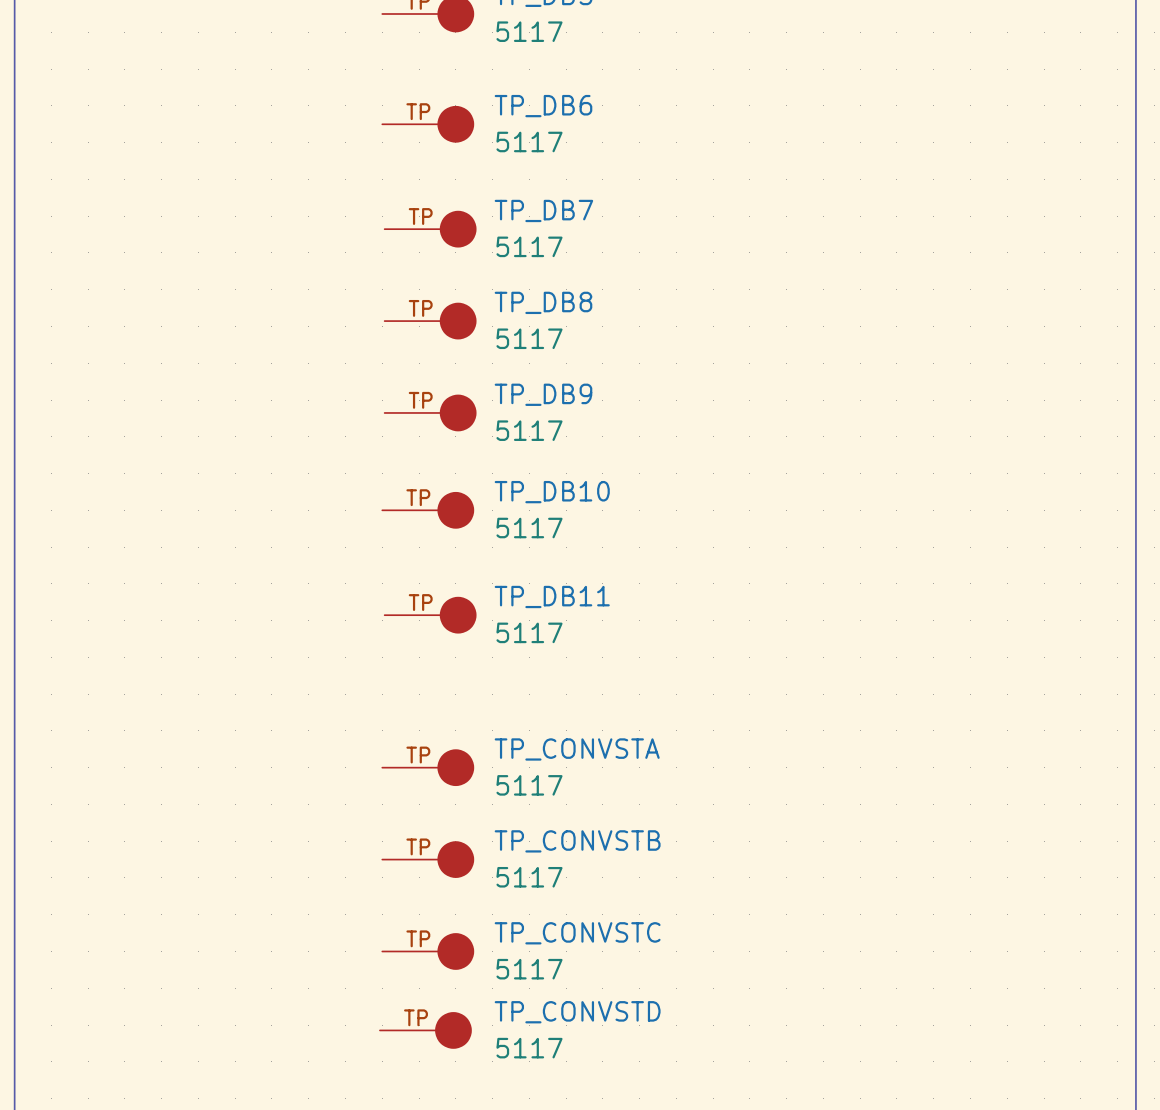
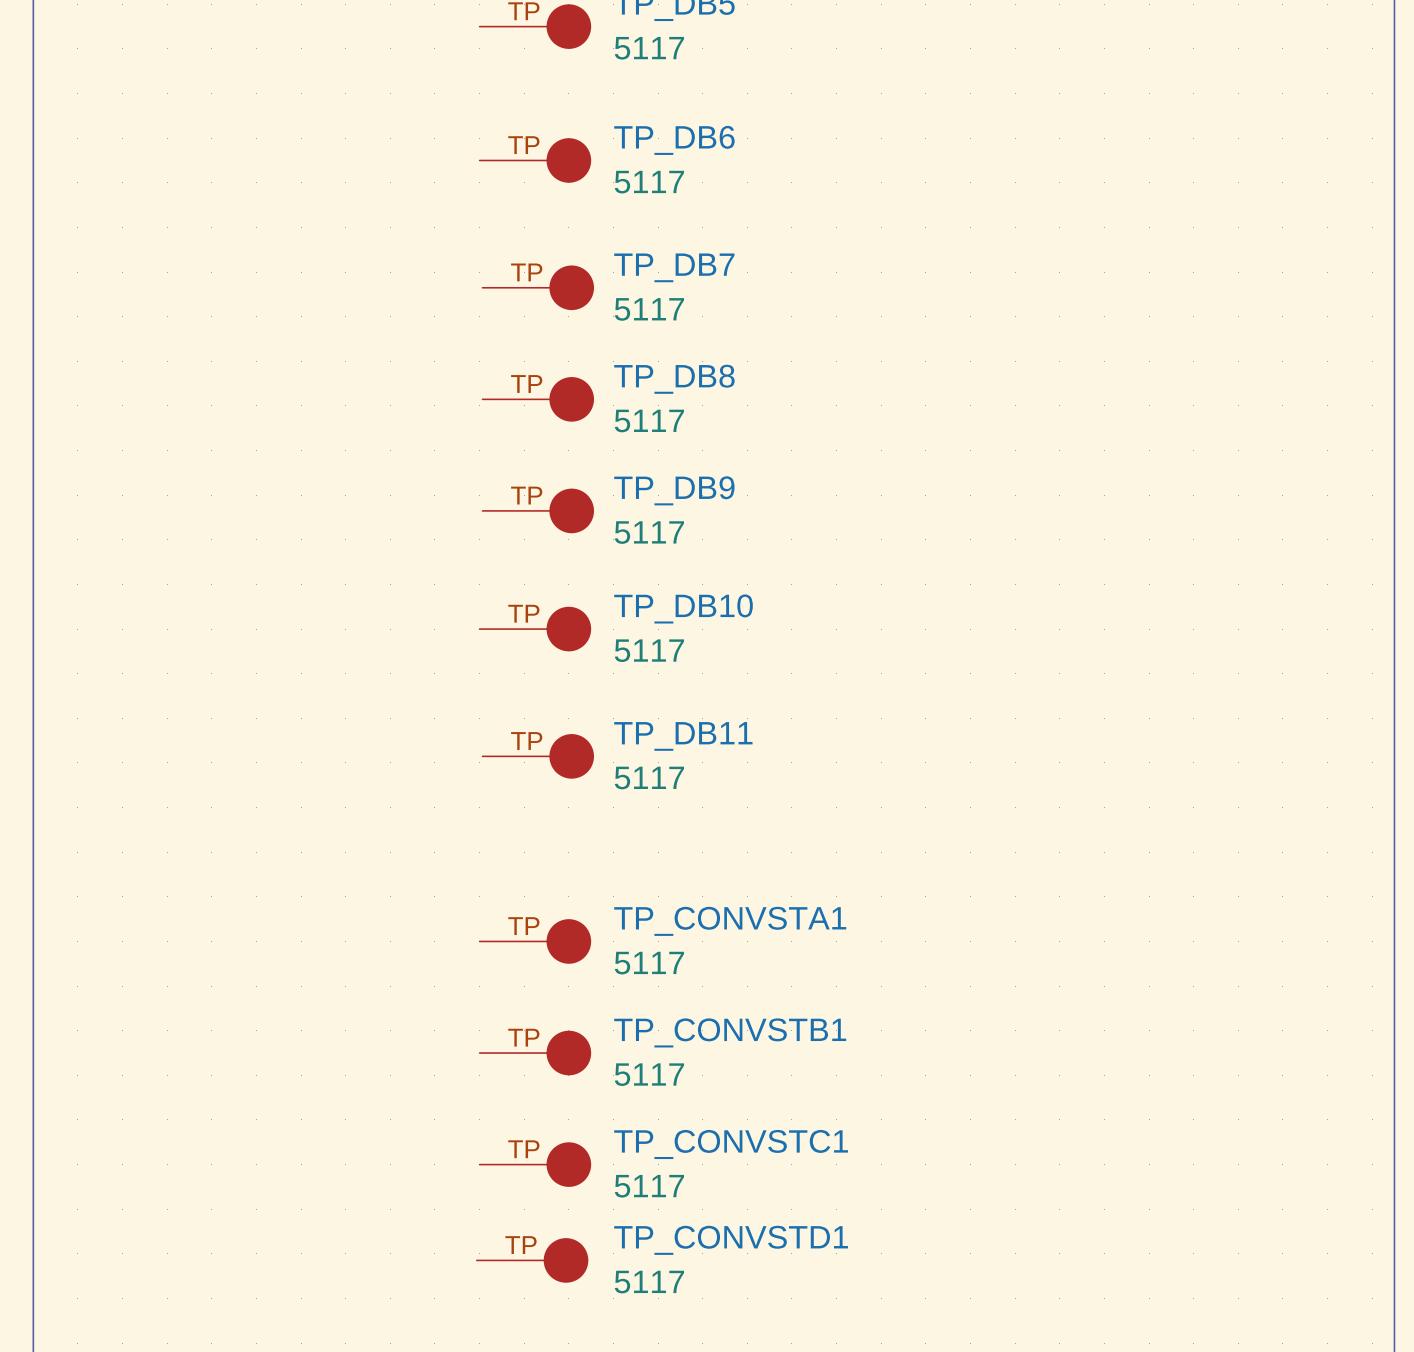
TP_CONVSTA name: TP_CONVSTA (577, 749) -> TP_CONVSTA1 (730, 921)
TP_CONVSTB name: TP_CONVSTB (577, 841) -> TP_CONVSTB1 (730, 1032)
TP_CONVSTC name: TP_CONVSTC (577, 933) -> TP_CONVSTC1 (731, 1144)
TP_CONVSTD name: TP_CONVSTD (577, 1012) -> TP_CONVSTD1 (731, 1240)

